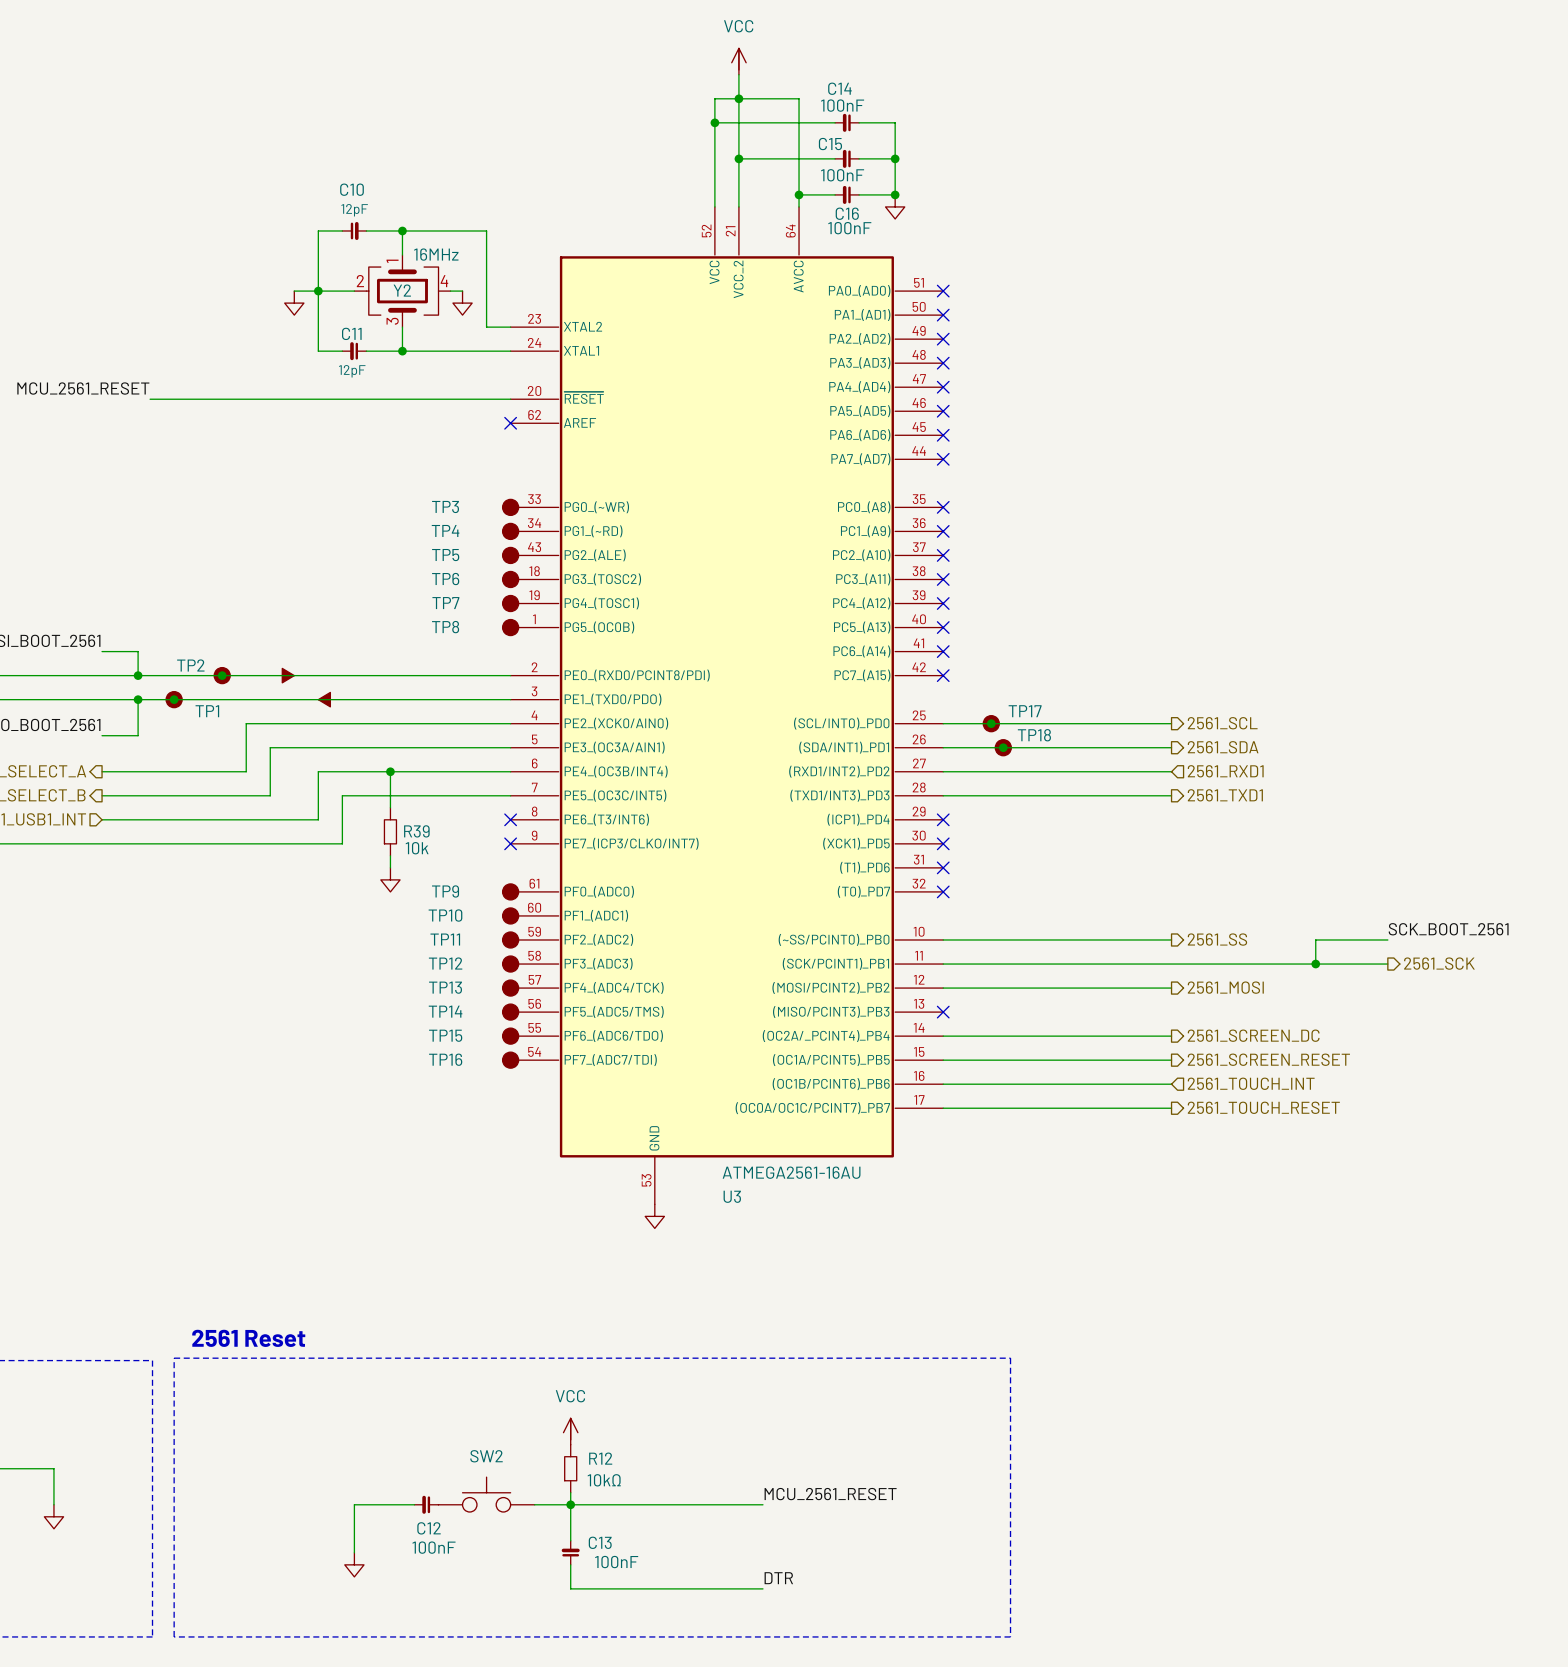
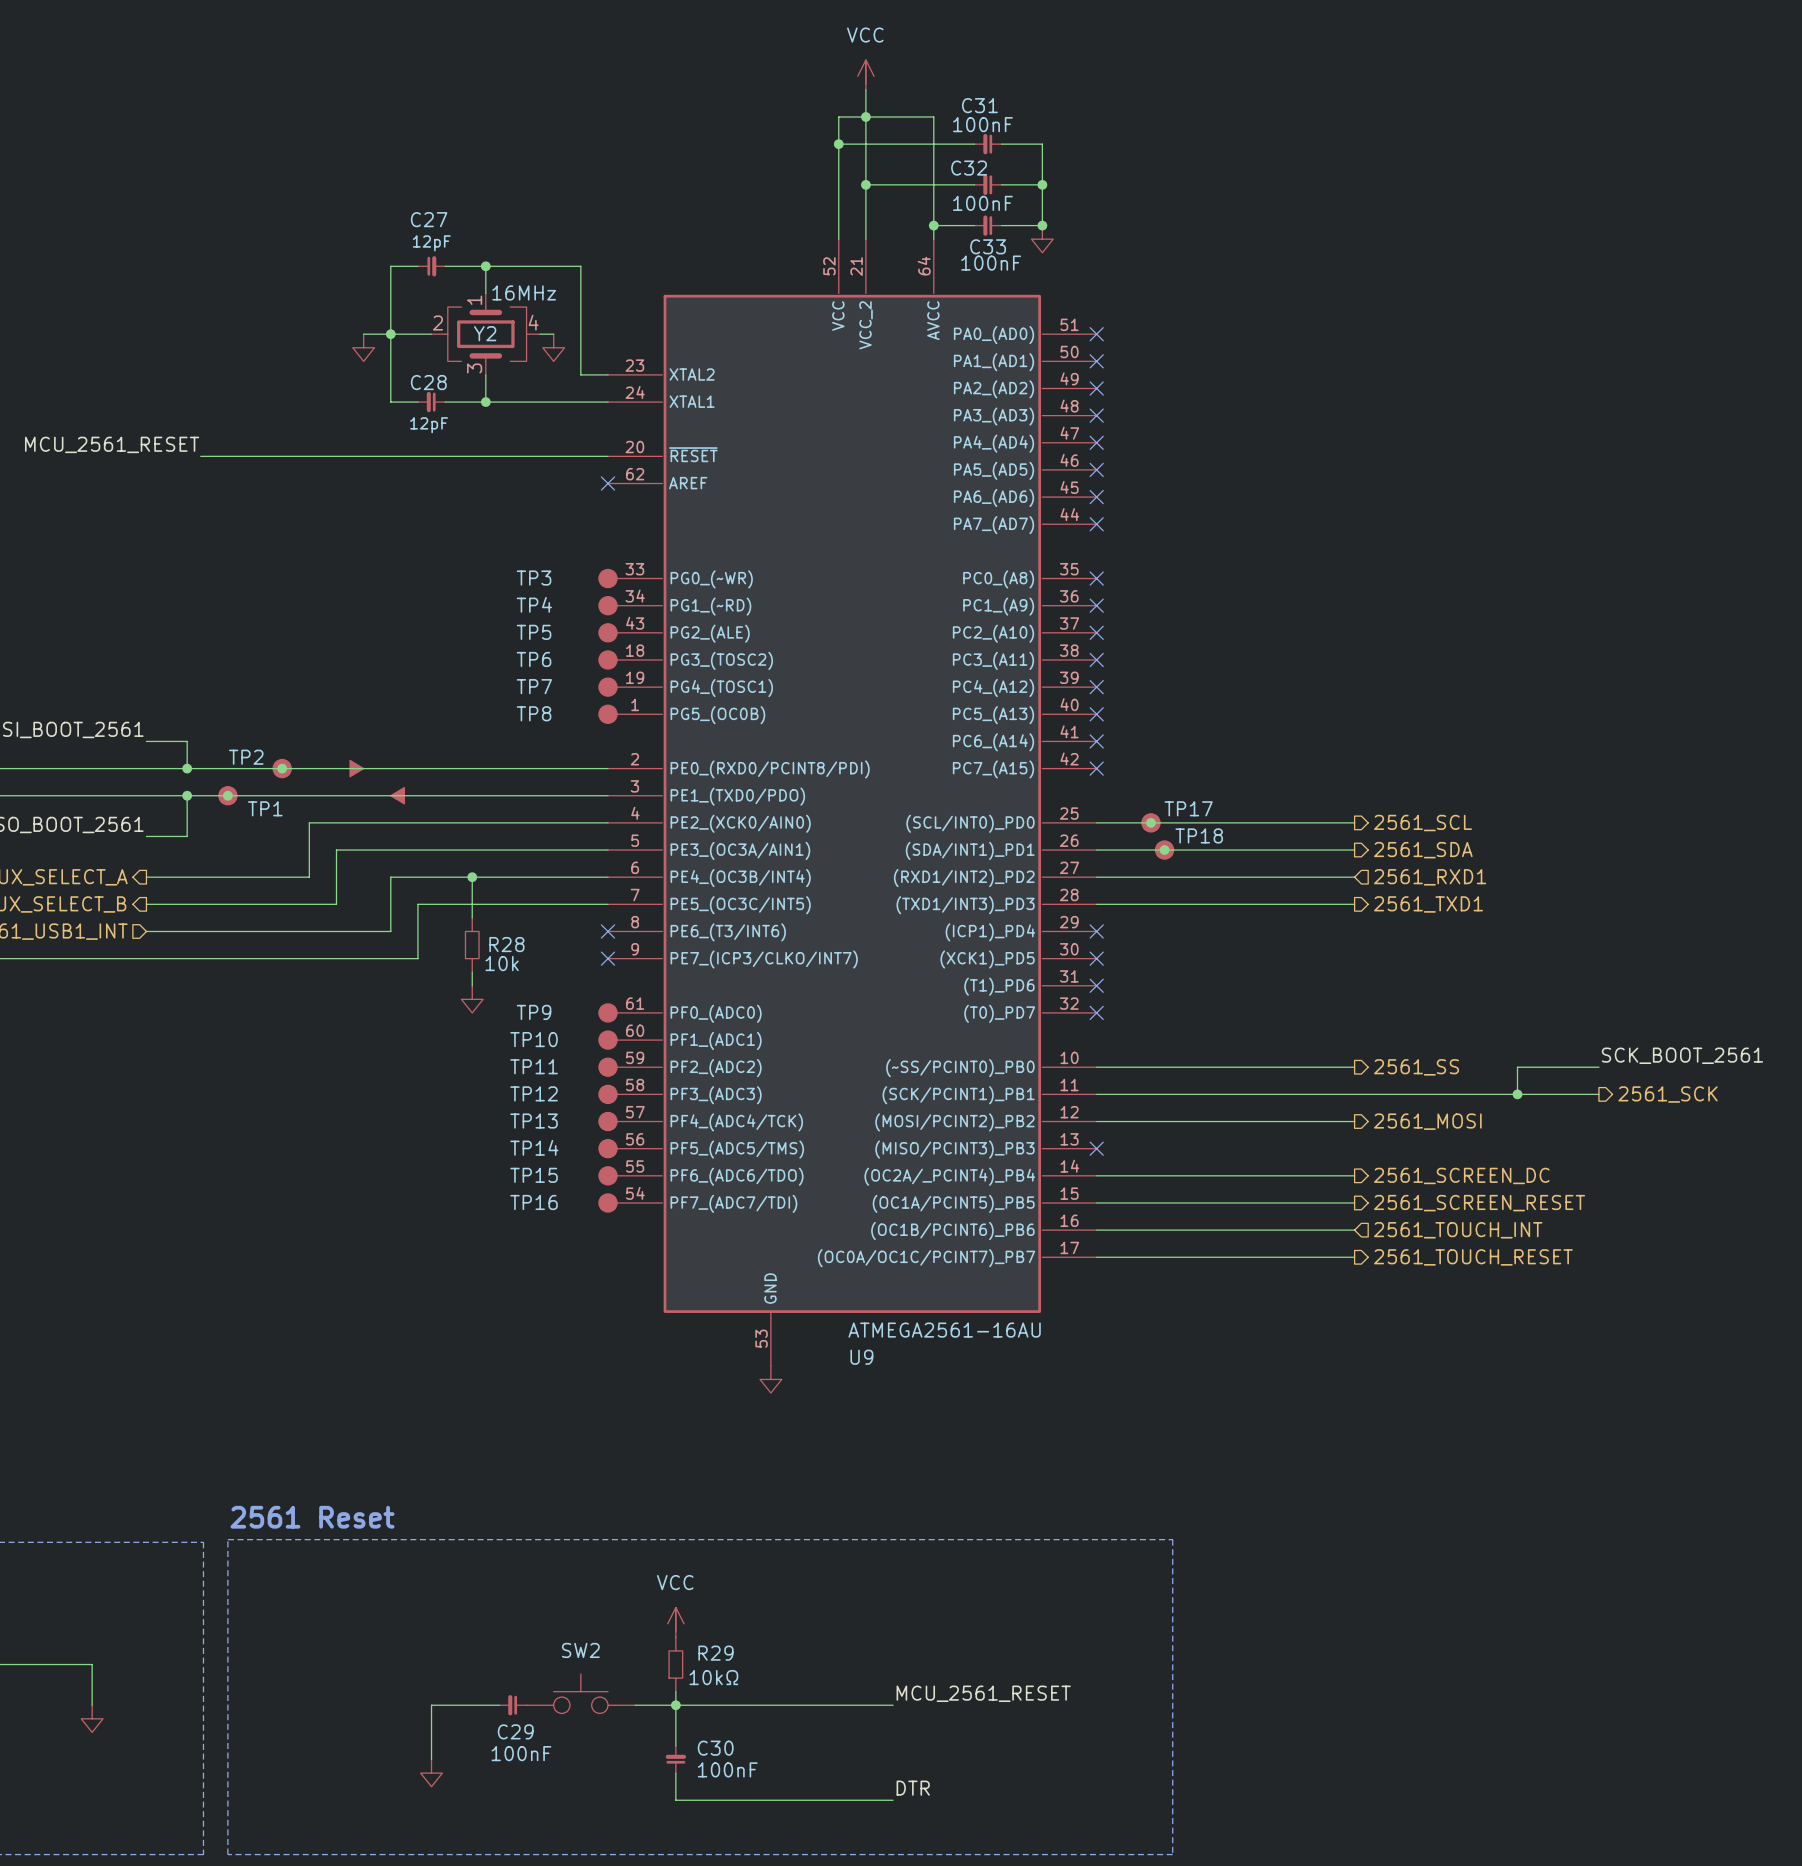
C14 name: C14 (839, 88) -> C31 (979, 105)
C15 name: C15 (830, 144) -> C32 (969, 168)
C10 name: C10 (352, 189) -> C27 (429, 219)
C16 name: C16 (847, 213) -> C33 (988, 246)
C11 name: C11 (351, 333) -> C28 (428, 382)
R39 name: R39 (416, 831) -> R28 (506, 944)
U3 name: U3 (732, 1196) -> U9 (861, 1357)
R12 name: R12 (600, 1458) -> R29 (715, 1653)
C12 name: C12 (429, 1528) -> C29 (515, 1731)
C13 name: C13 (600, 1542) -> C30 (715, 1748)

